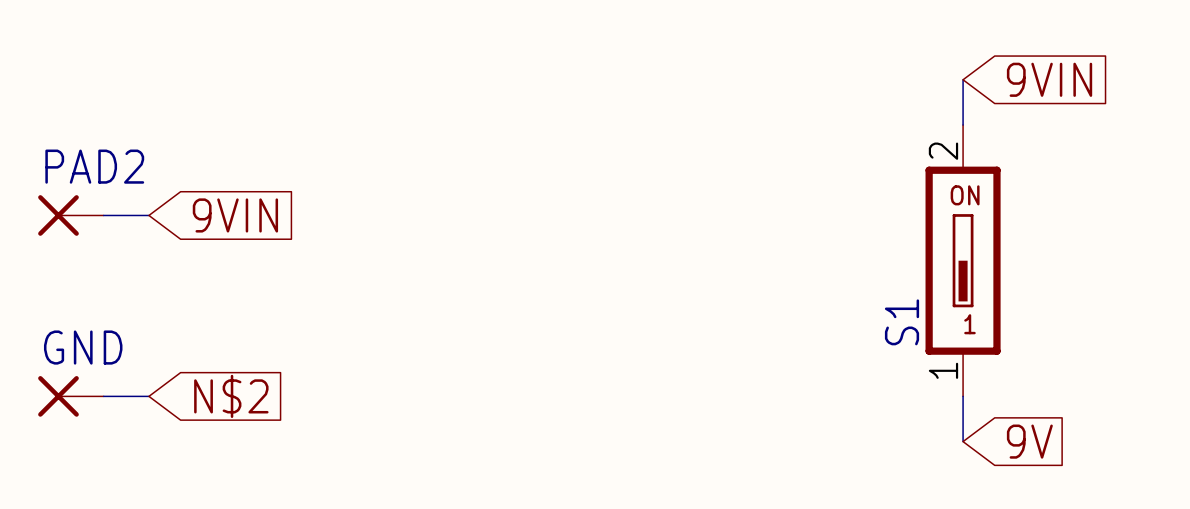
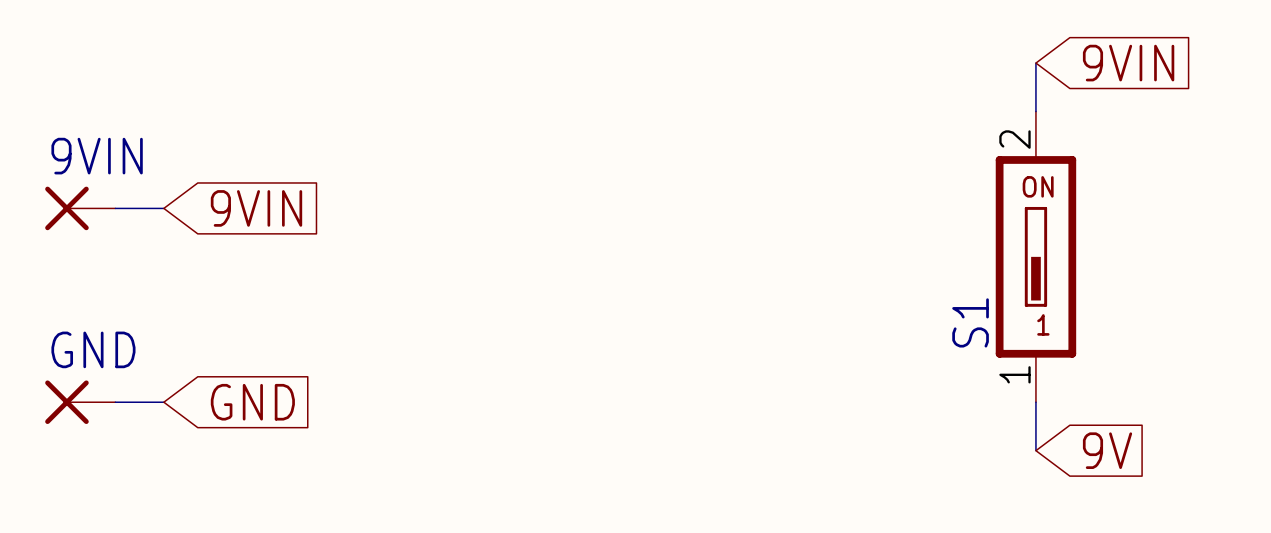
PAD2 name: PAD2 (94, 166) -> 9VIN (97, 156)
global label: N$2 (231, 396) -> GND (252, 402)

